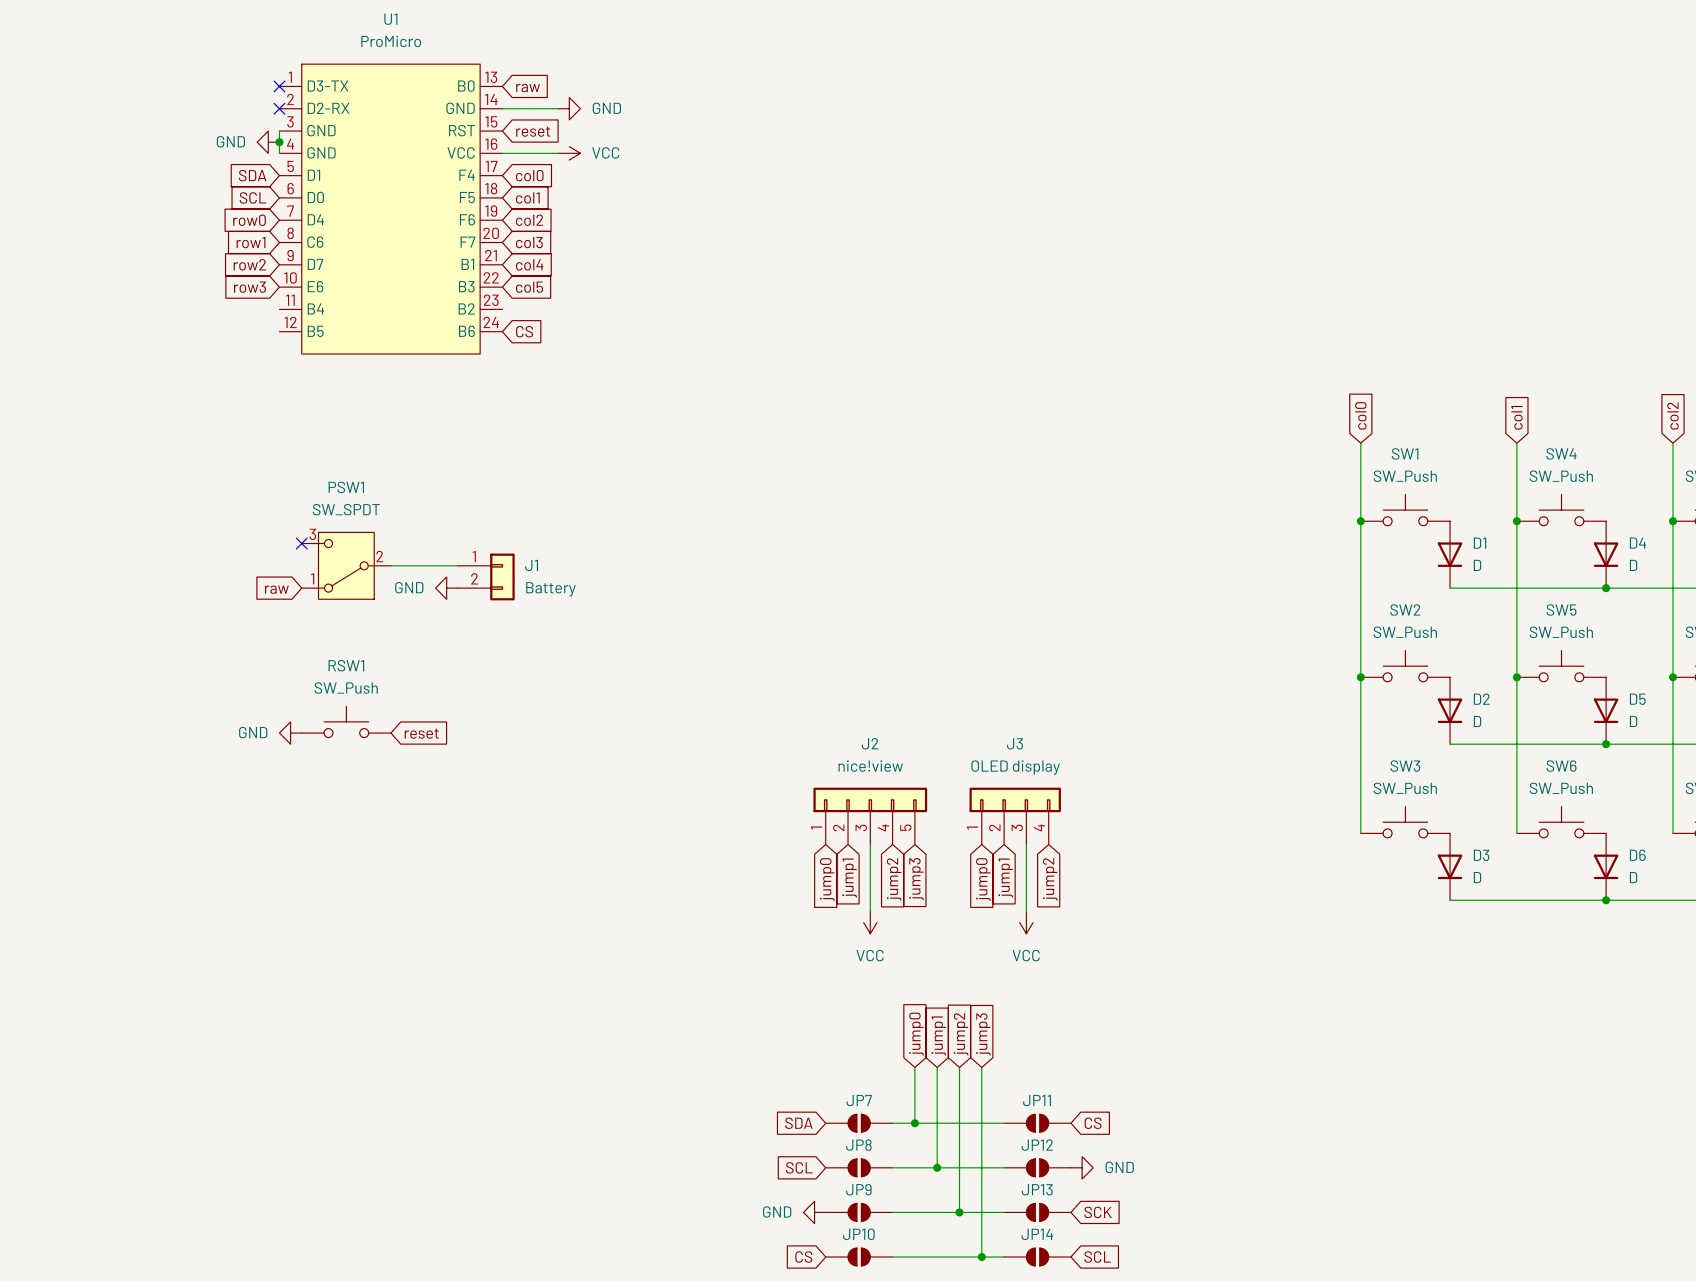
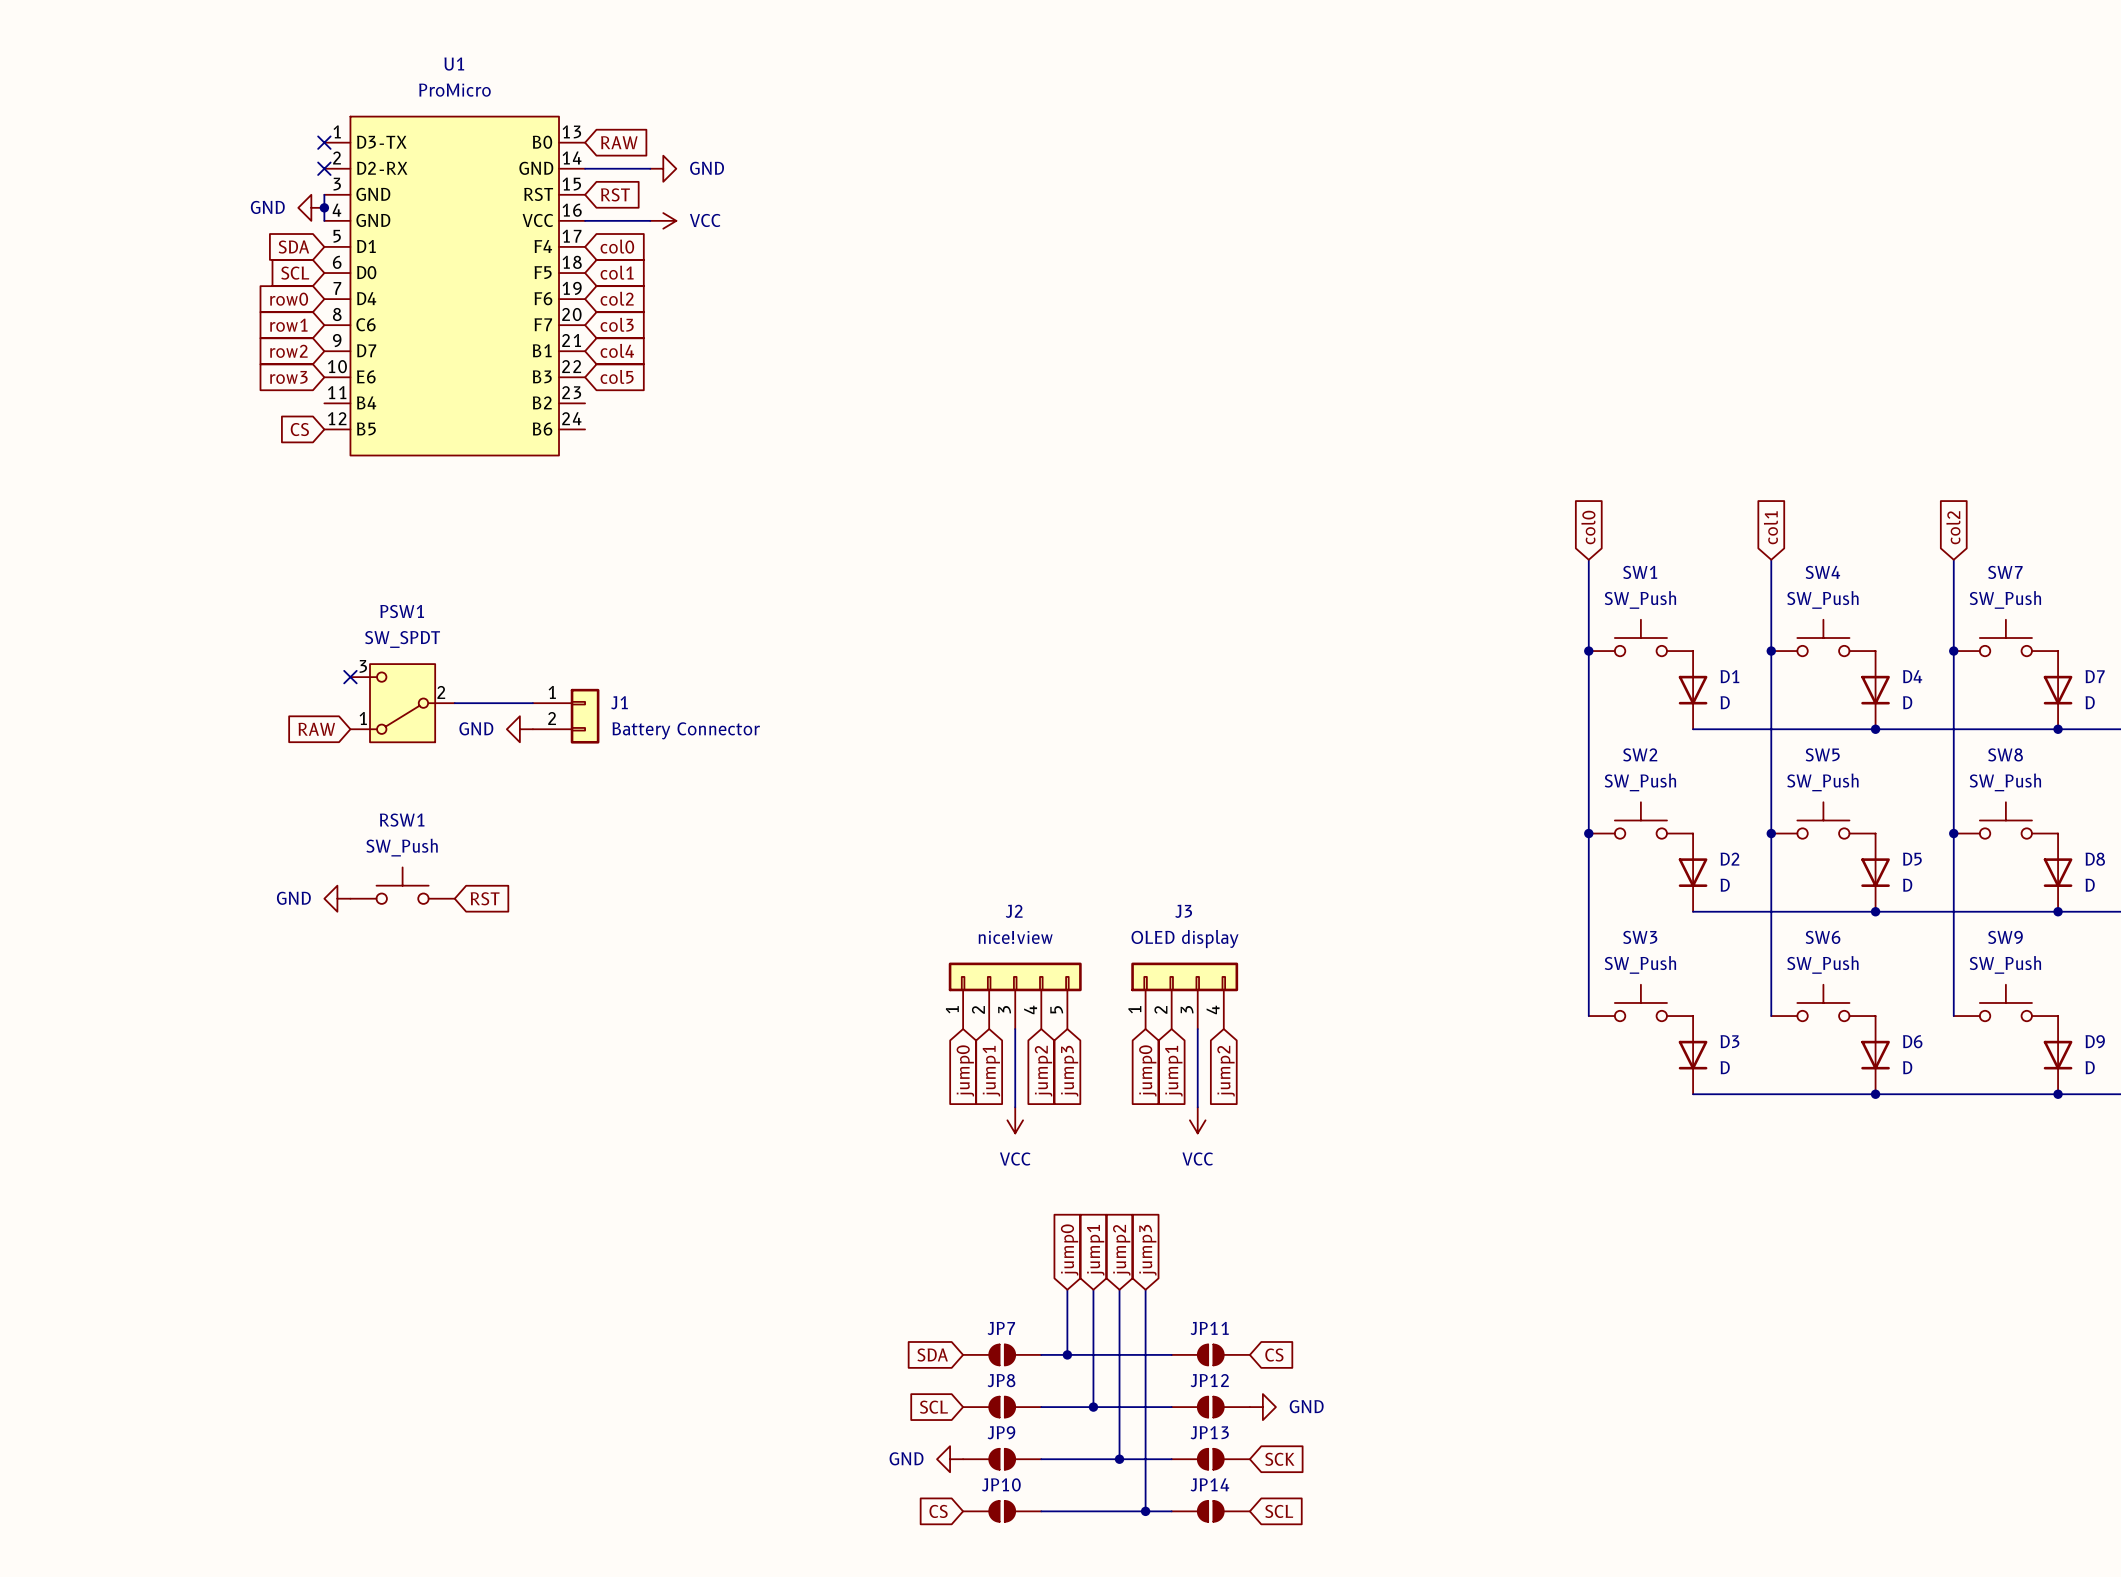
global label: raw (528, 87) -> RAW (619, 142)
global label: reset (533, 131) -> RST (615, 194)
global label: none -> CS (299, 429)
global label: CS (524, 331) -> none
global label: raw (276, 589) -> RAW (316, 729)
J1 value: Battery (550, 589) -> Battery Connector (686, 730)
global label: reset (421, 733) -> RST (485, 898)

